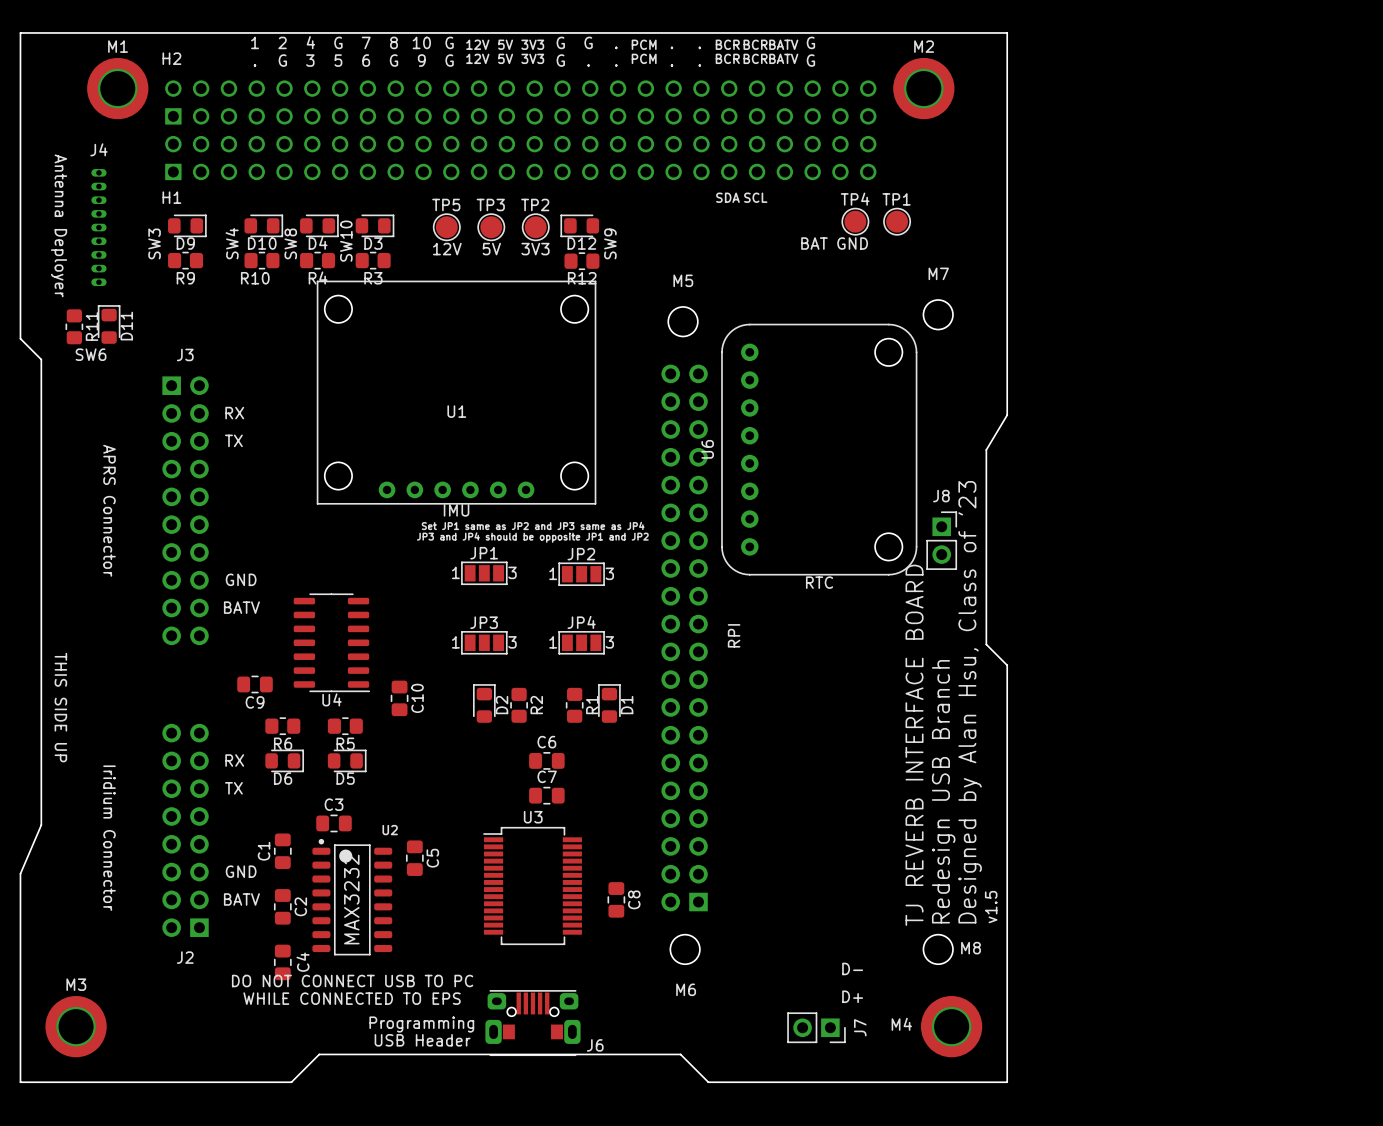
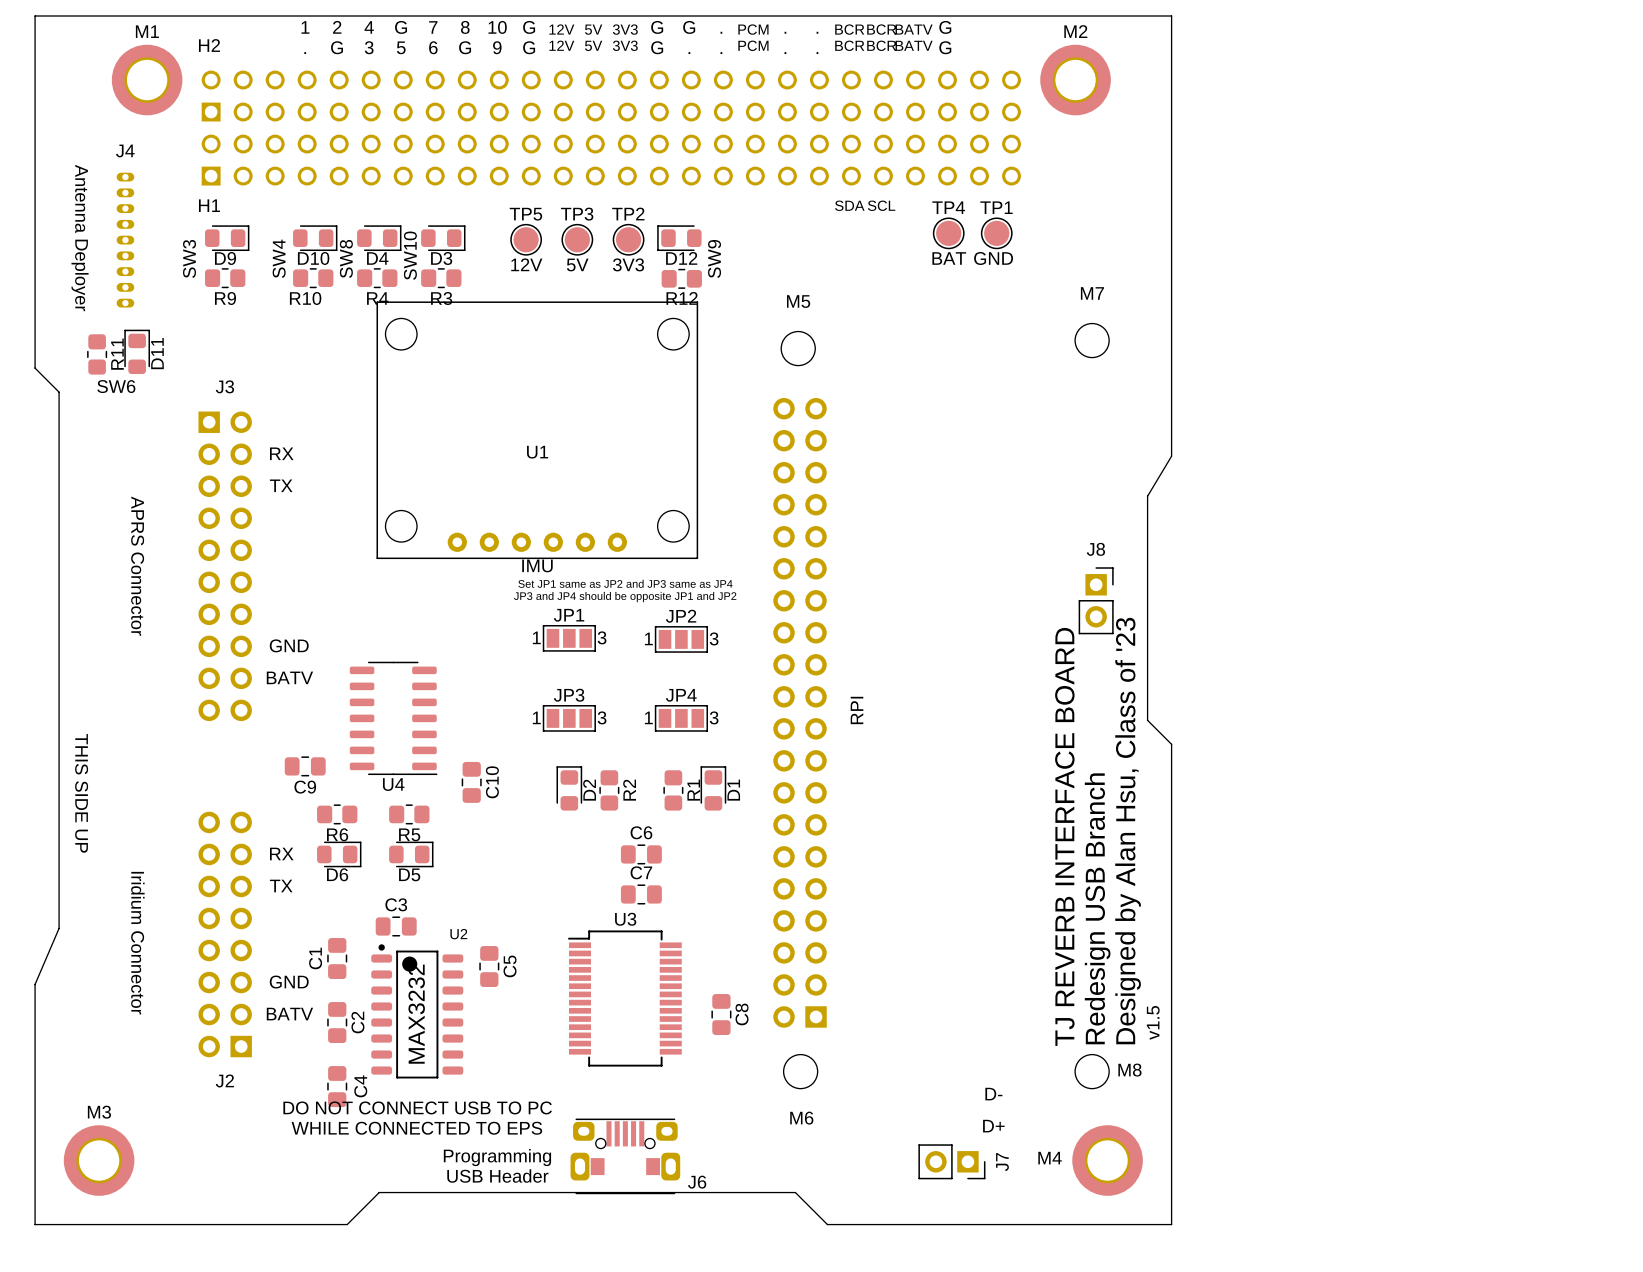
TP4 name: TP4 (855, 199) -> TP1 (996, 207)
TP4: none -> (948, 233)
TP1: (897, 221) -> none
U6: (819, 449) -> none
text: RTC (819, 582) -> none

